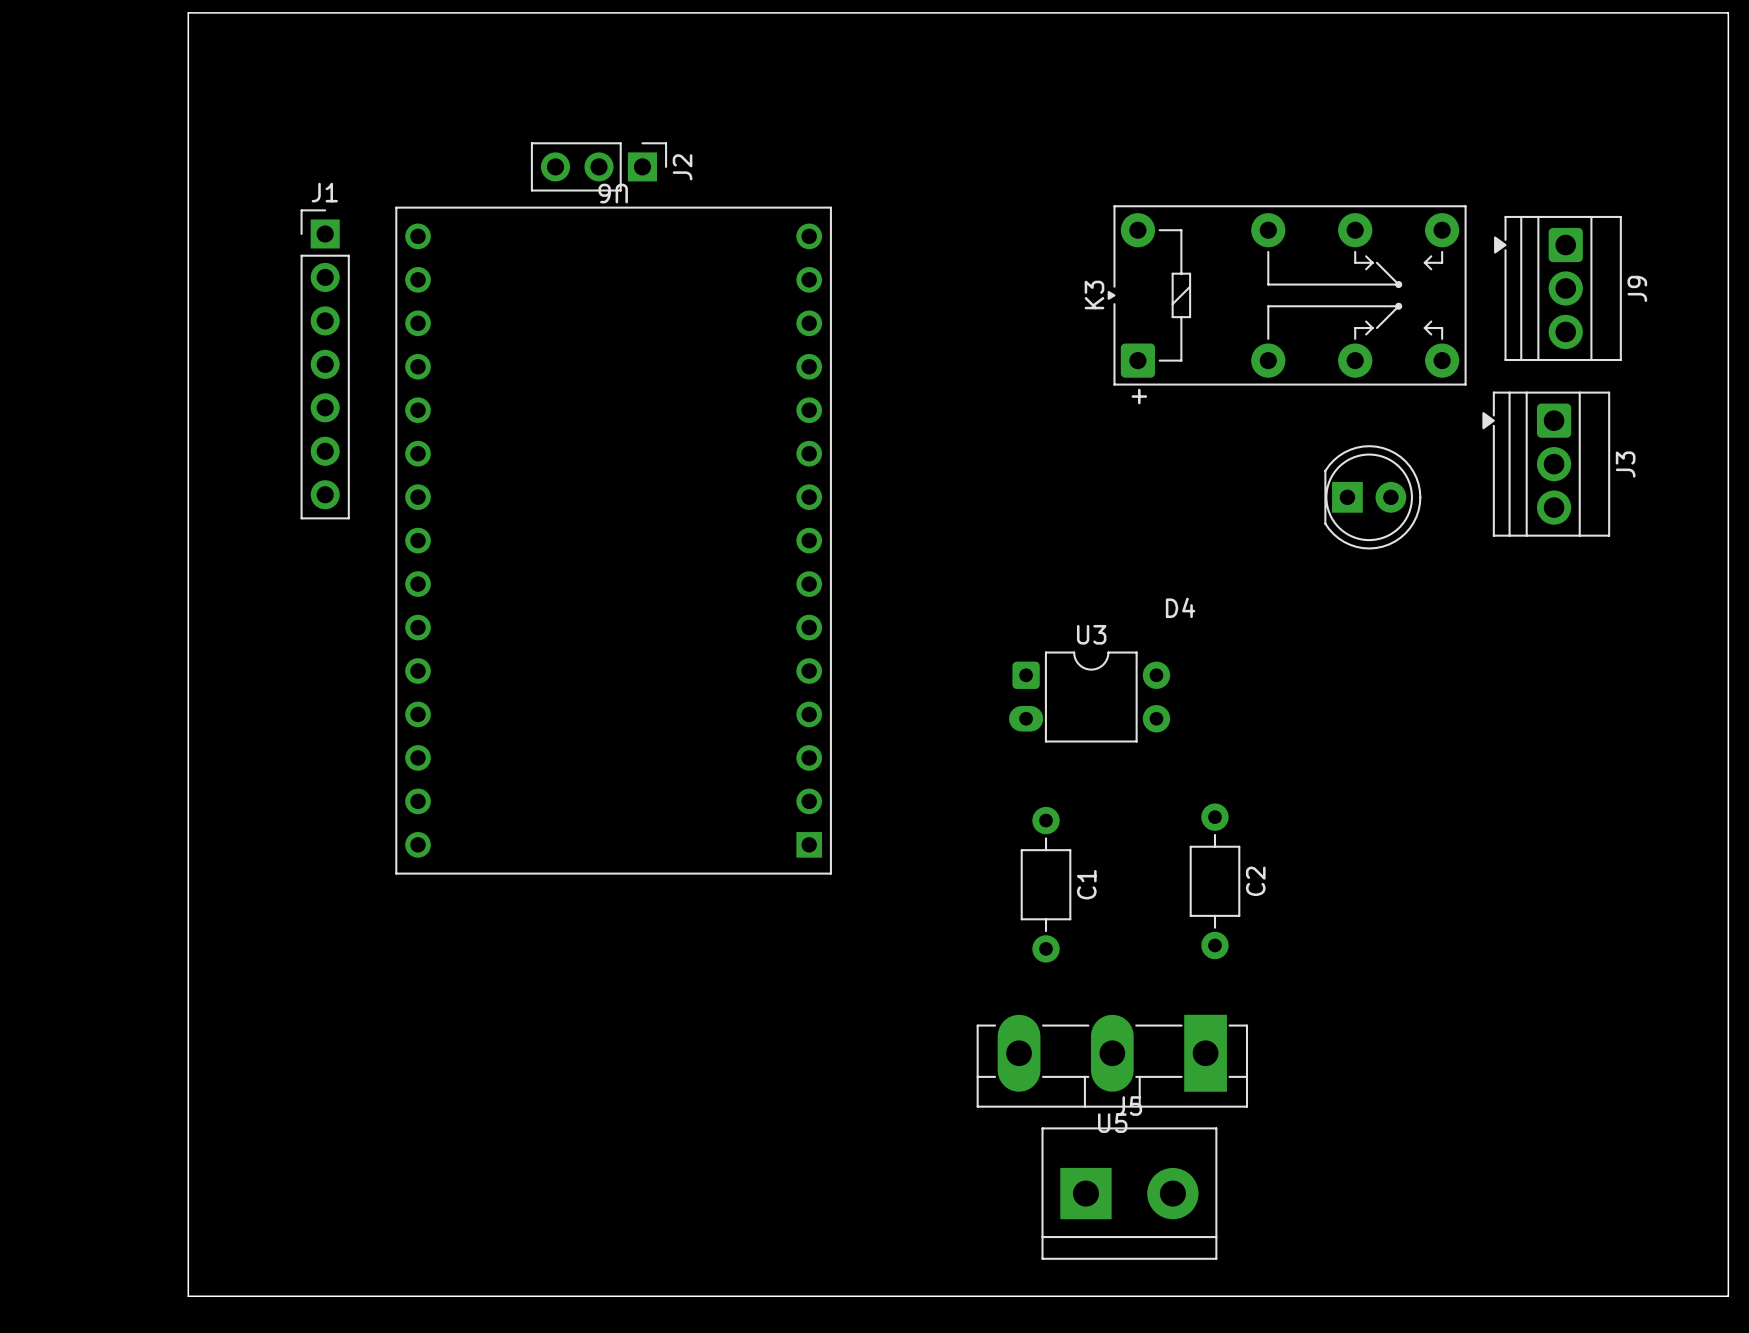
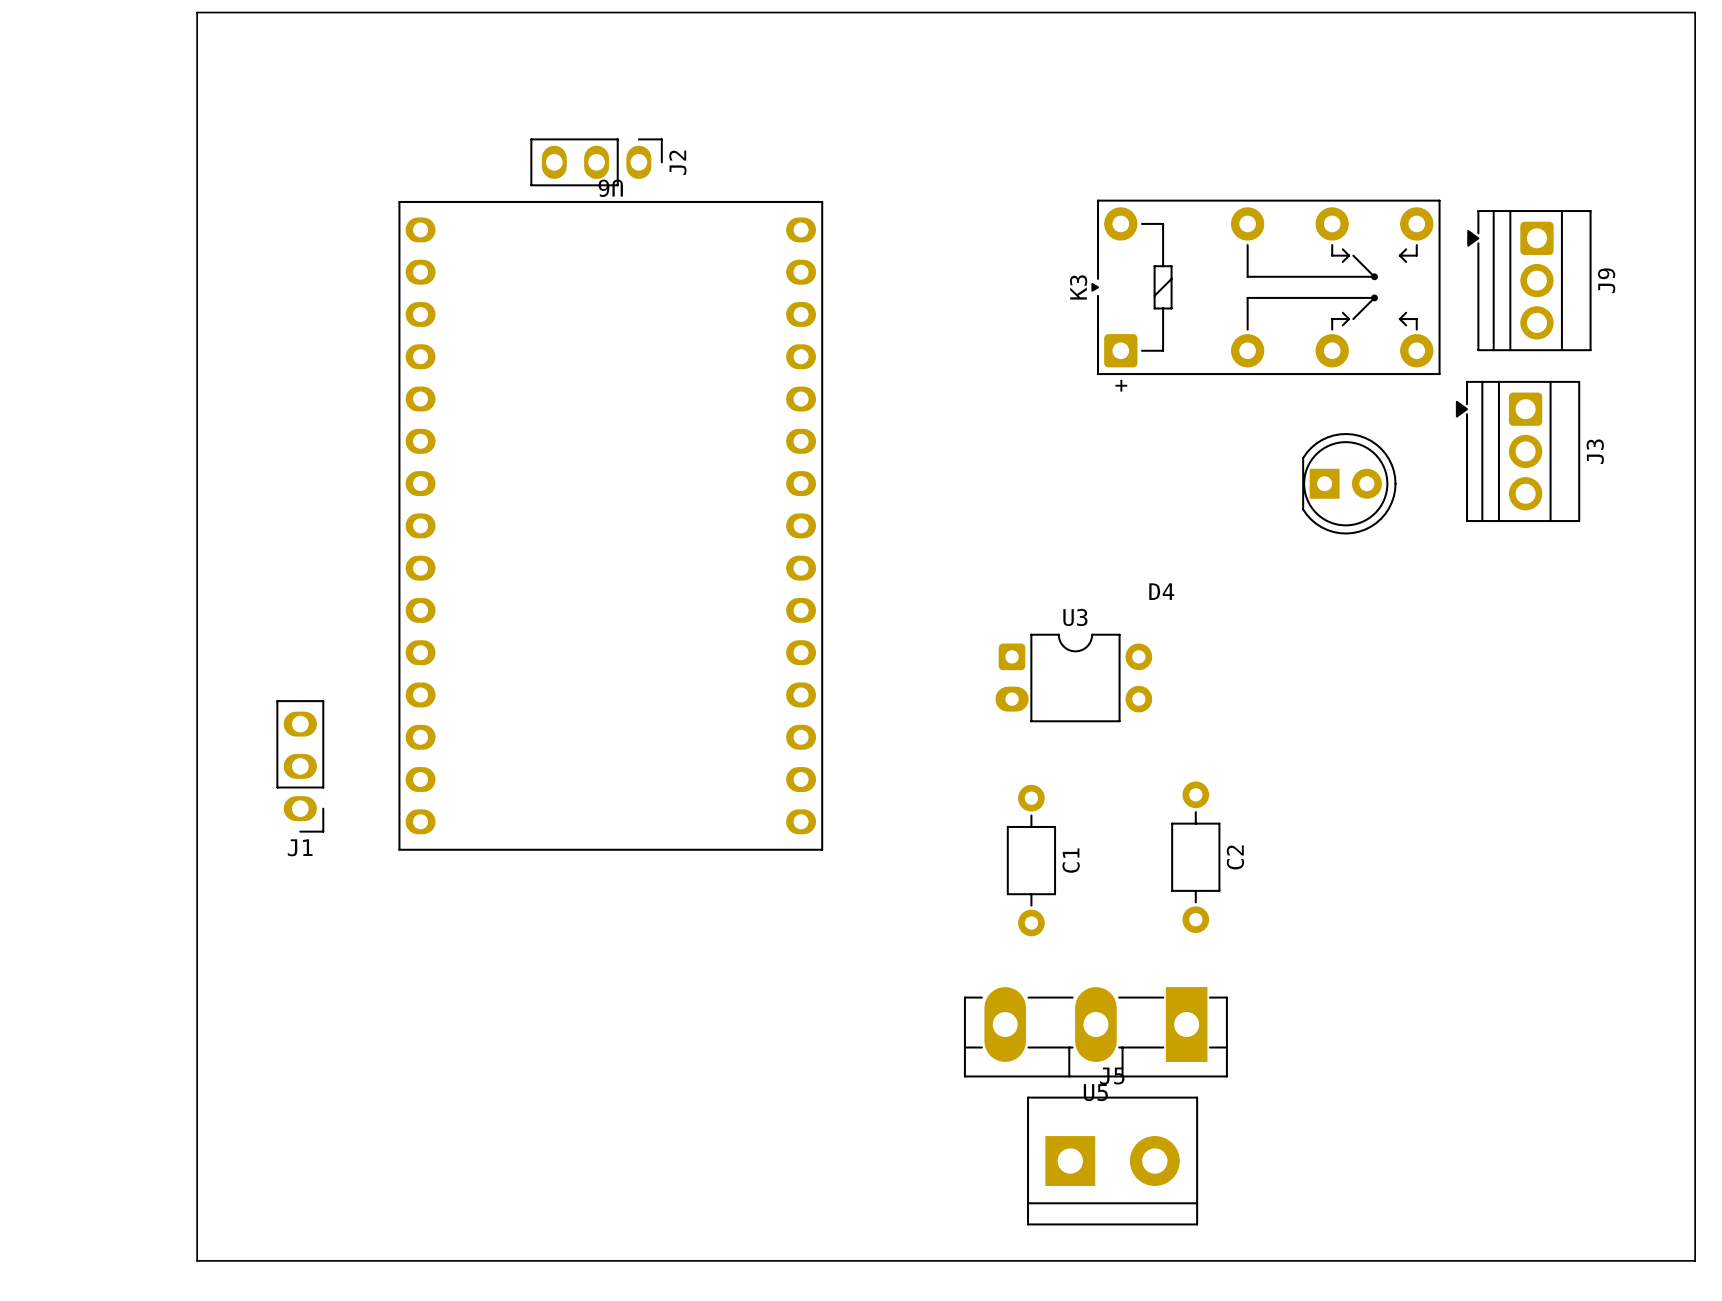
J2 footprint: [530, 142, 668, 192] -> [530, 138, 663, 187]
J1 name position: J1 (324, 192) -> J1 (300, 847)
U6 footprint: [395, 206, 832, 875] -> [398, 200, 824, 851]
J1 footprint: [300, 209, 350, 520] -> [276, 700, 325, 833]

